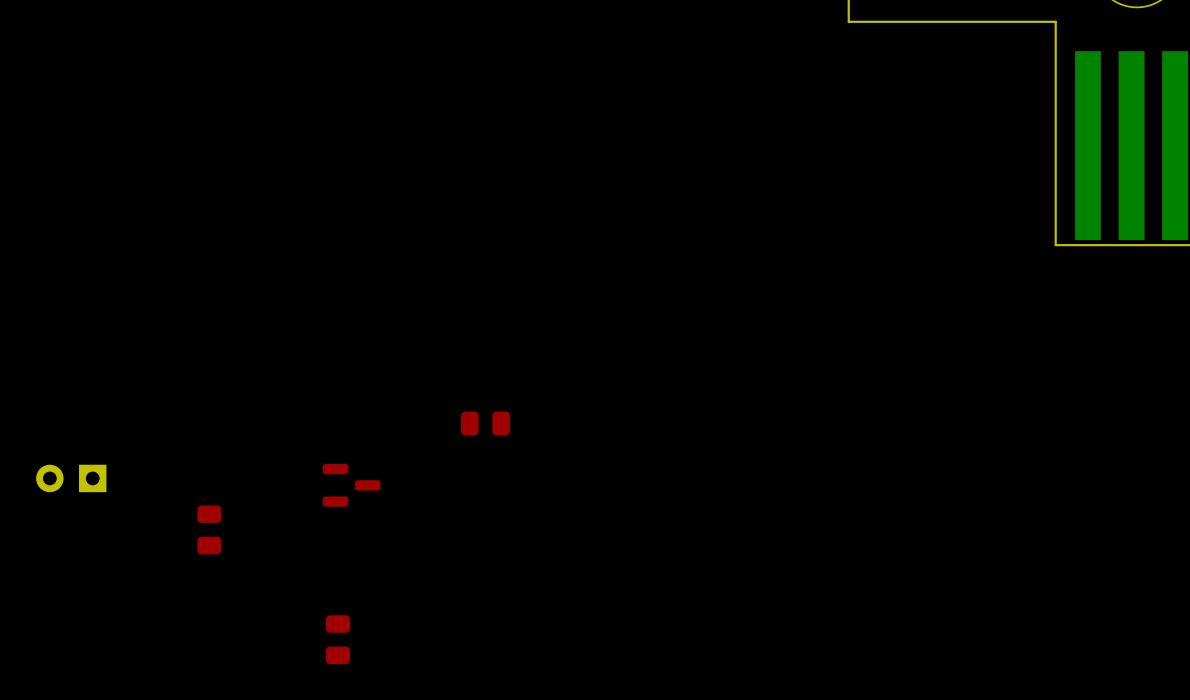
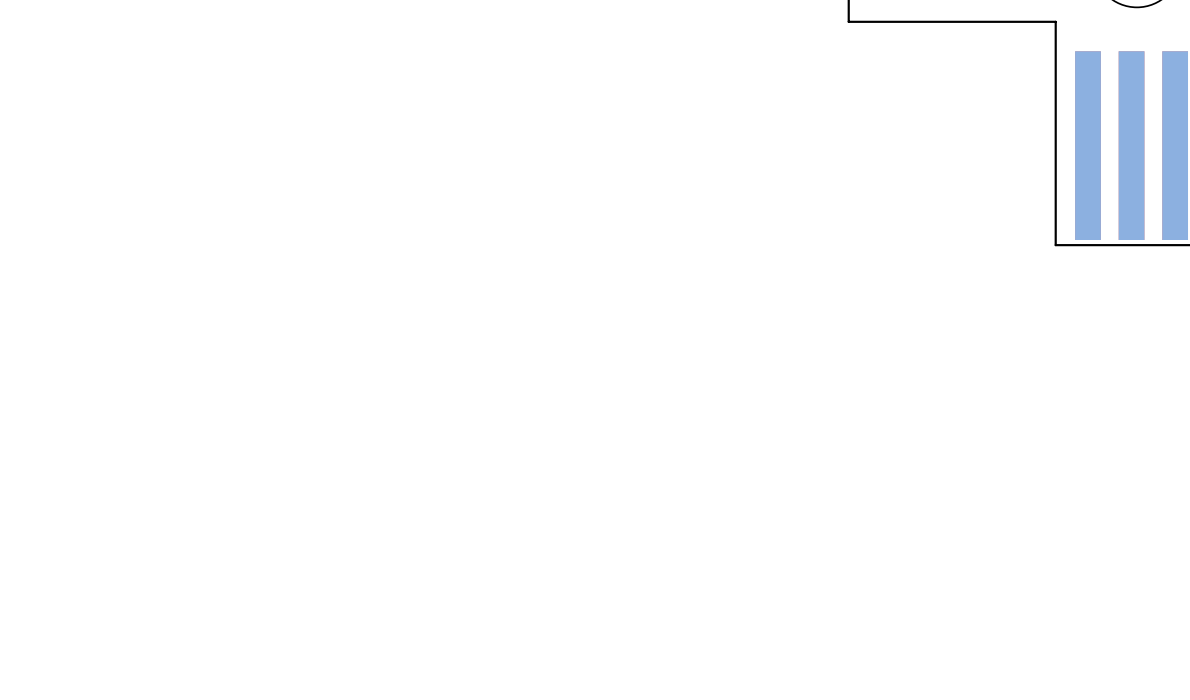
part: (485, 423) -> none
part: (71, 478) -> none
part: (351, 485) -> none
part: (209, 529) -> none
part: (337, 639) -> none

